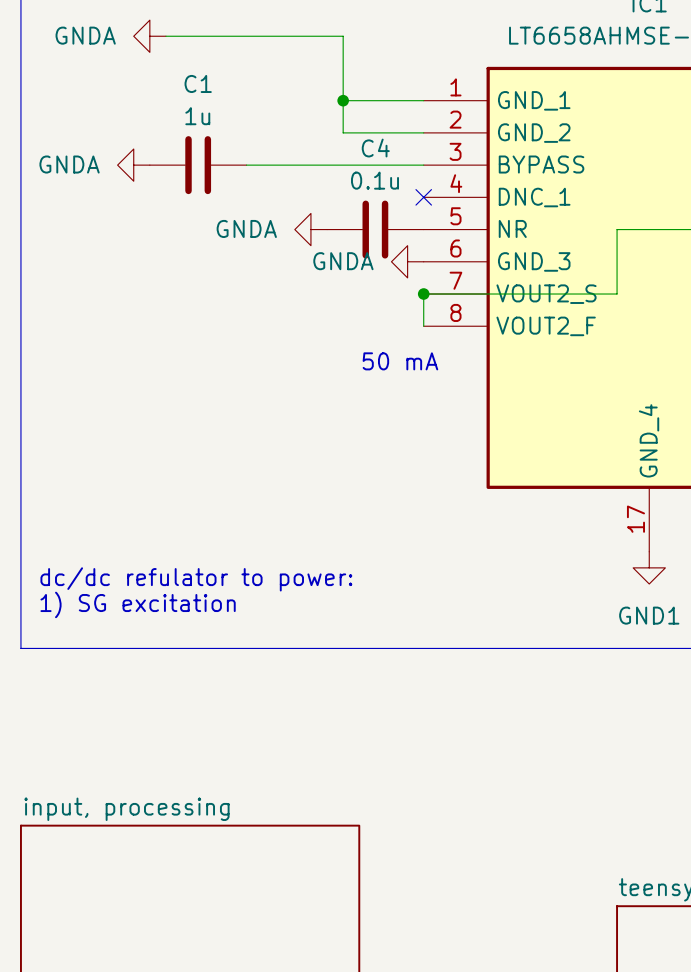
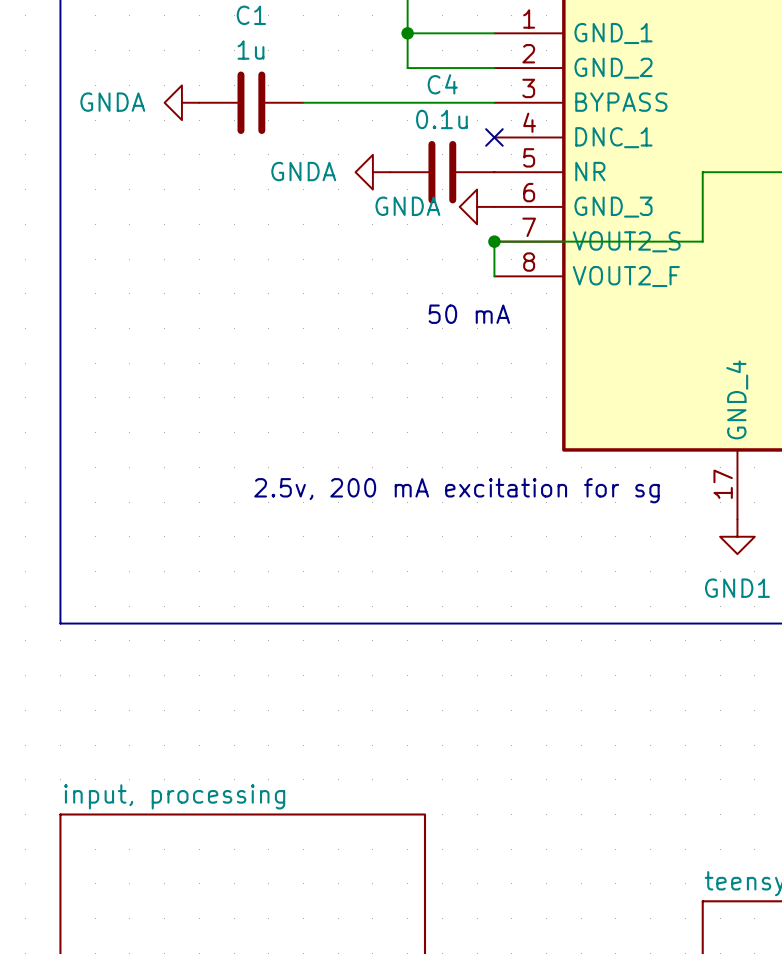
text: none -> 2.5v, 200 mA excitation for sg (456, 490)
text: dc/dc refulator to power: (196, 579) -> none
text: 1) SG excitation (138, 604) -> none

